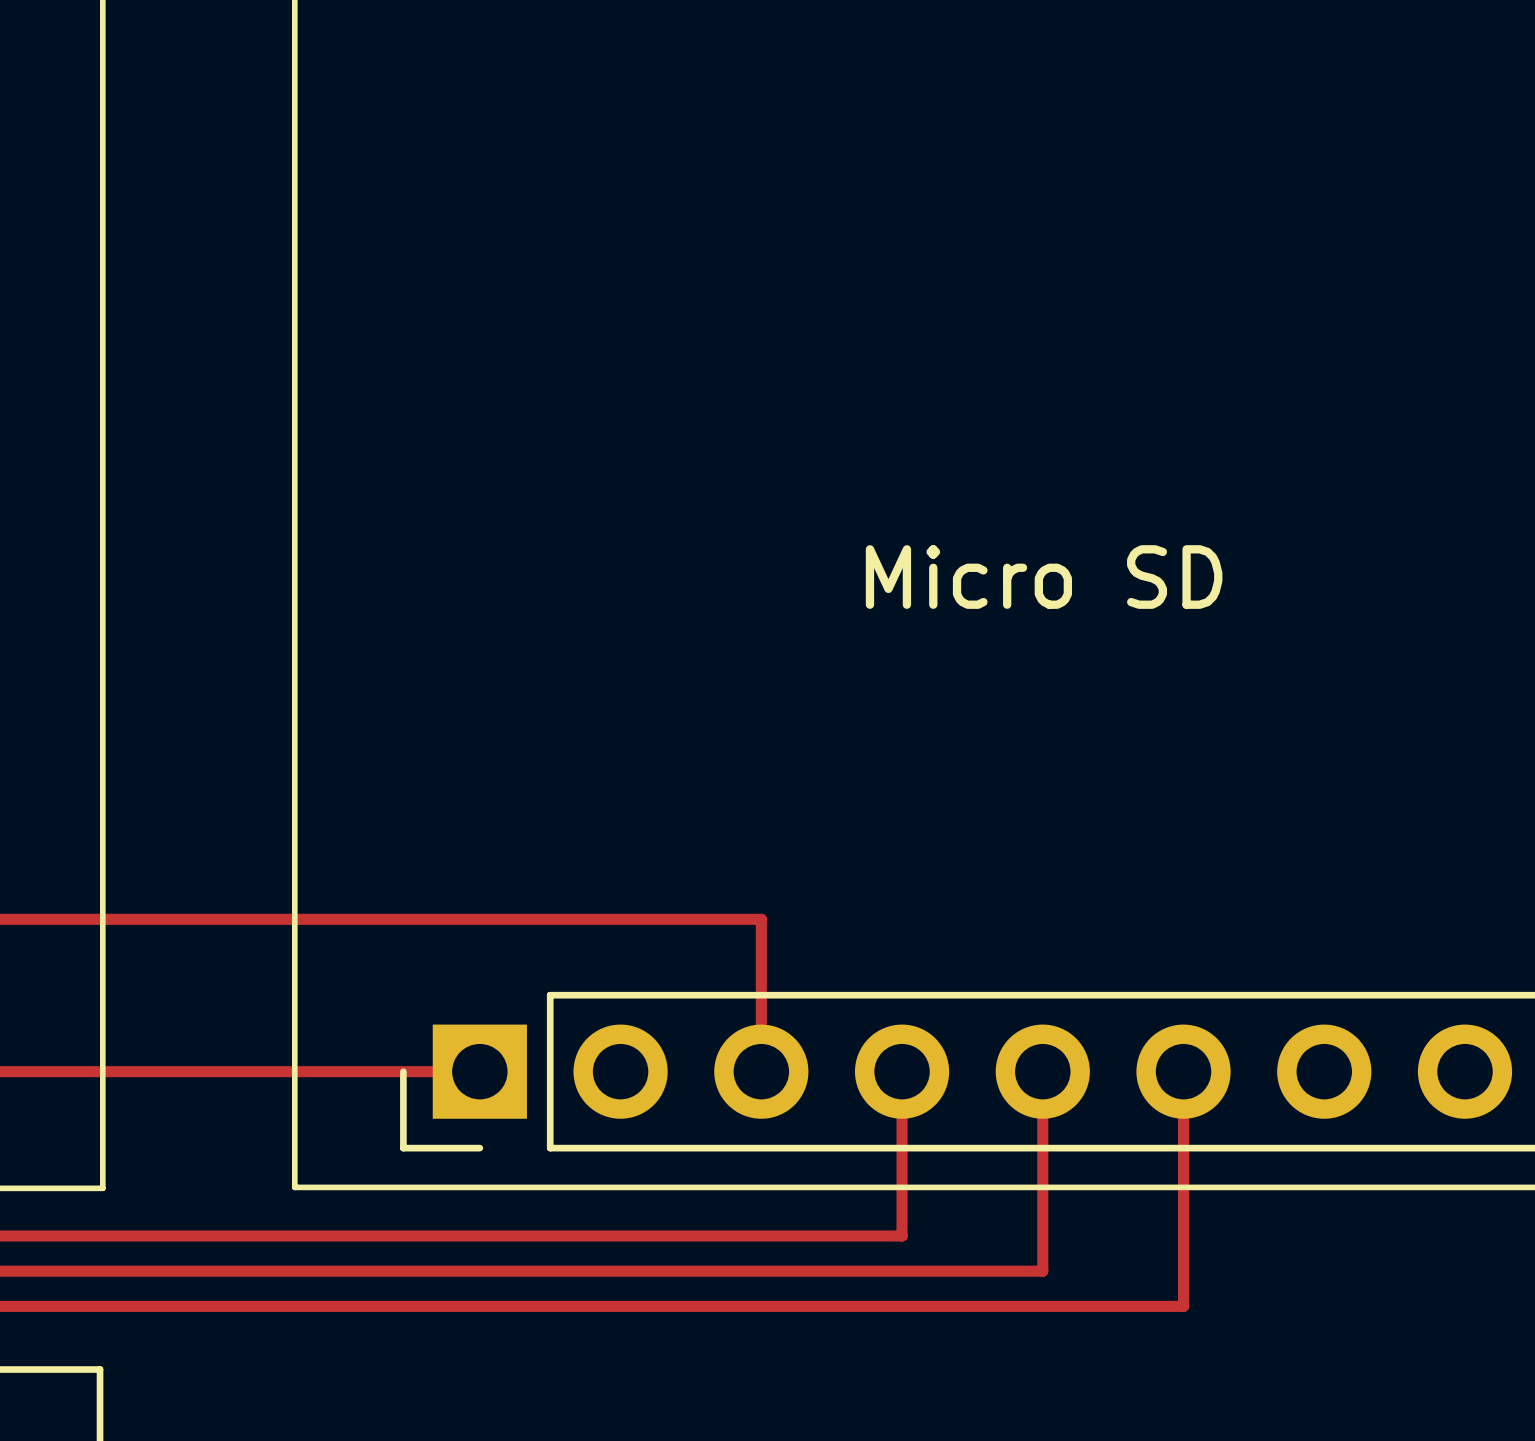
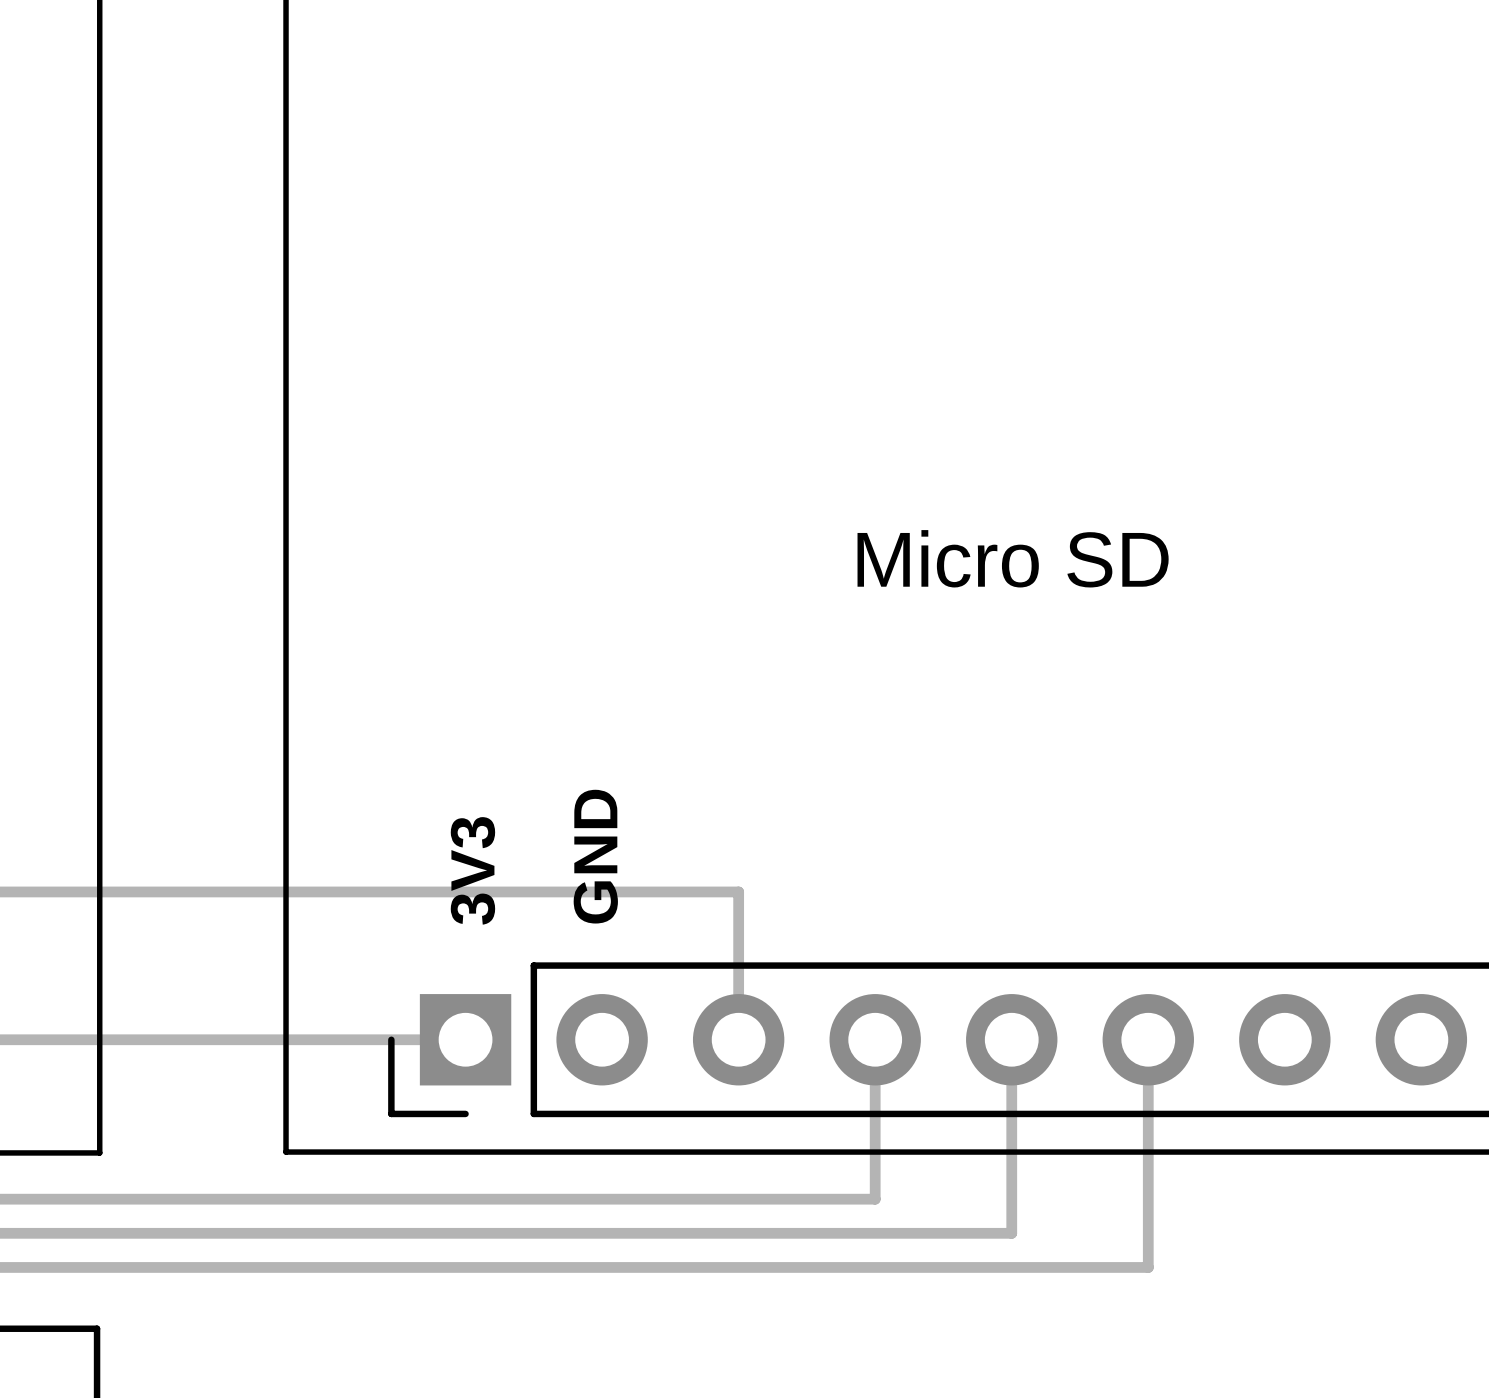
text: none -> GND (595, 856)
text: none -> 3V3 (472, 870)

